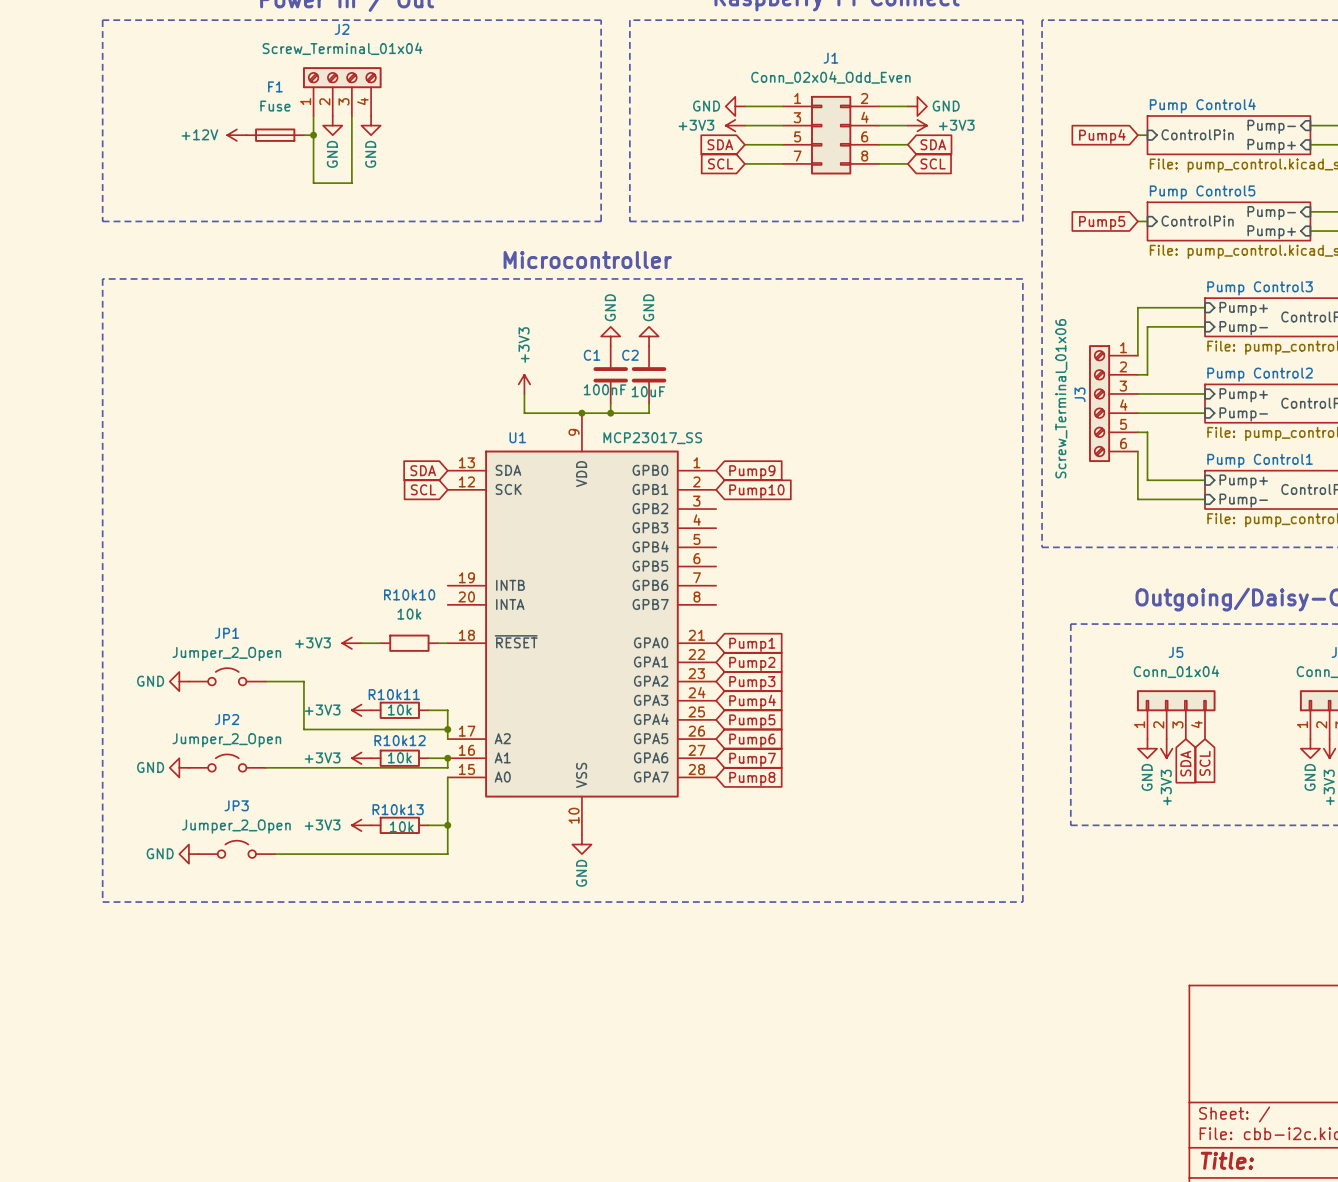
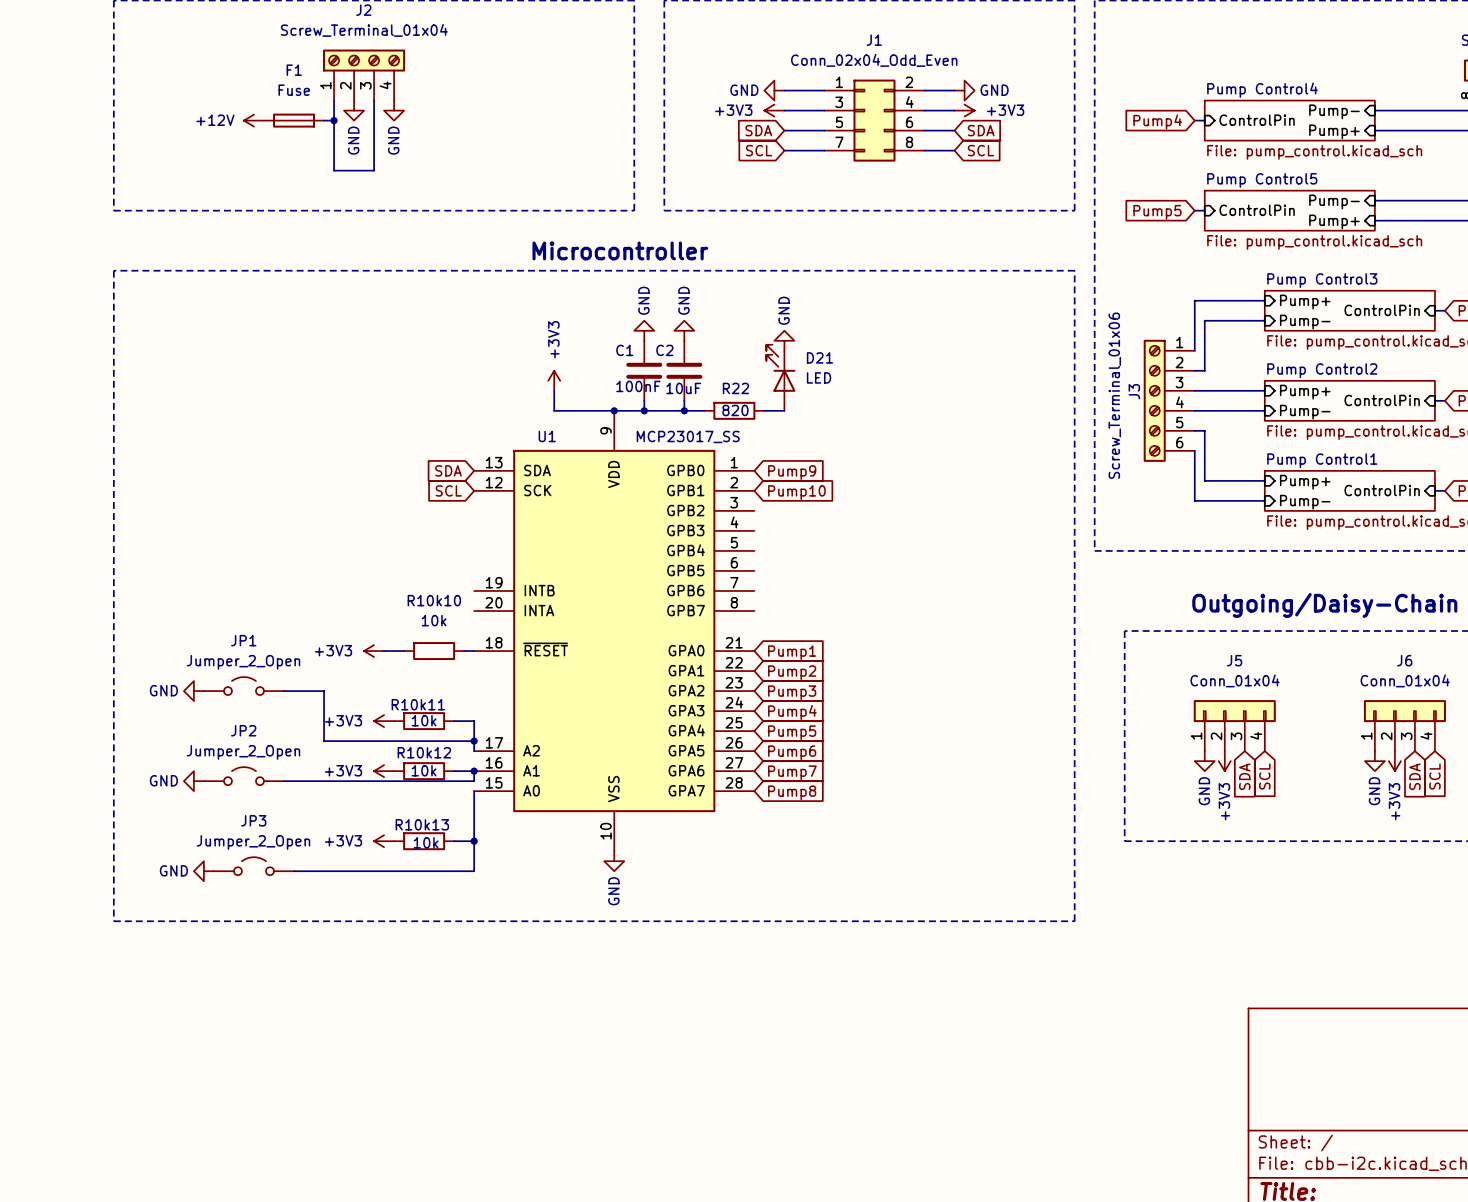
power symbol: none -> GND (784, 340)
D21: none -> LED (780, 377)
wire: none -> (684, 410) (704, 410)
junction: none -> (684, 410)
R22: none -> 820 (734, 410)
wire: none -> (764, 410) (784, 410)

